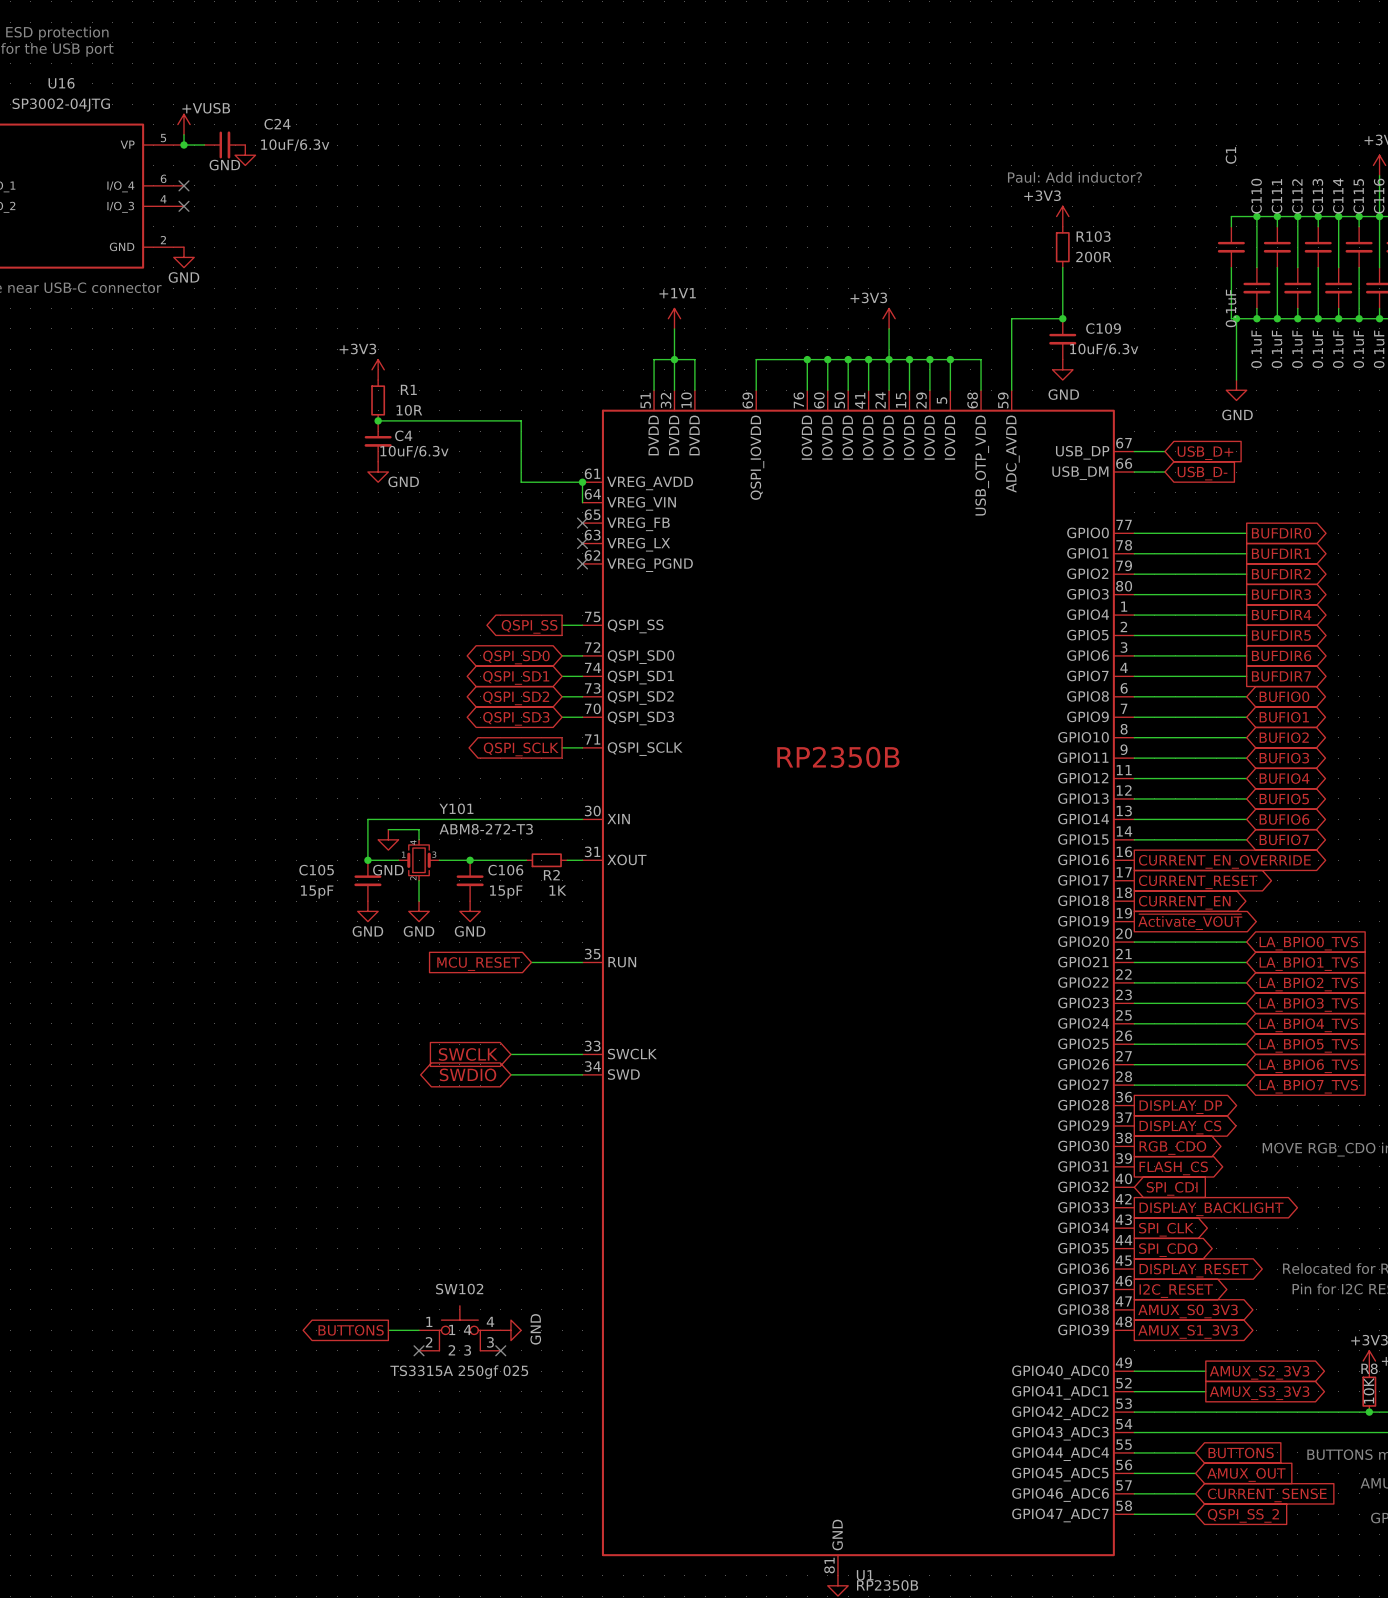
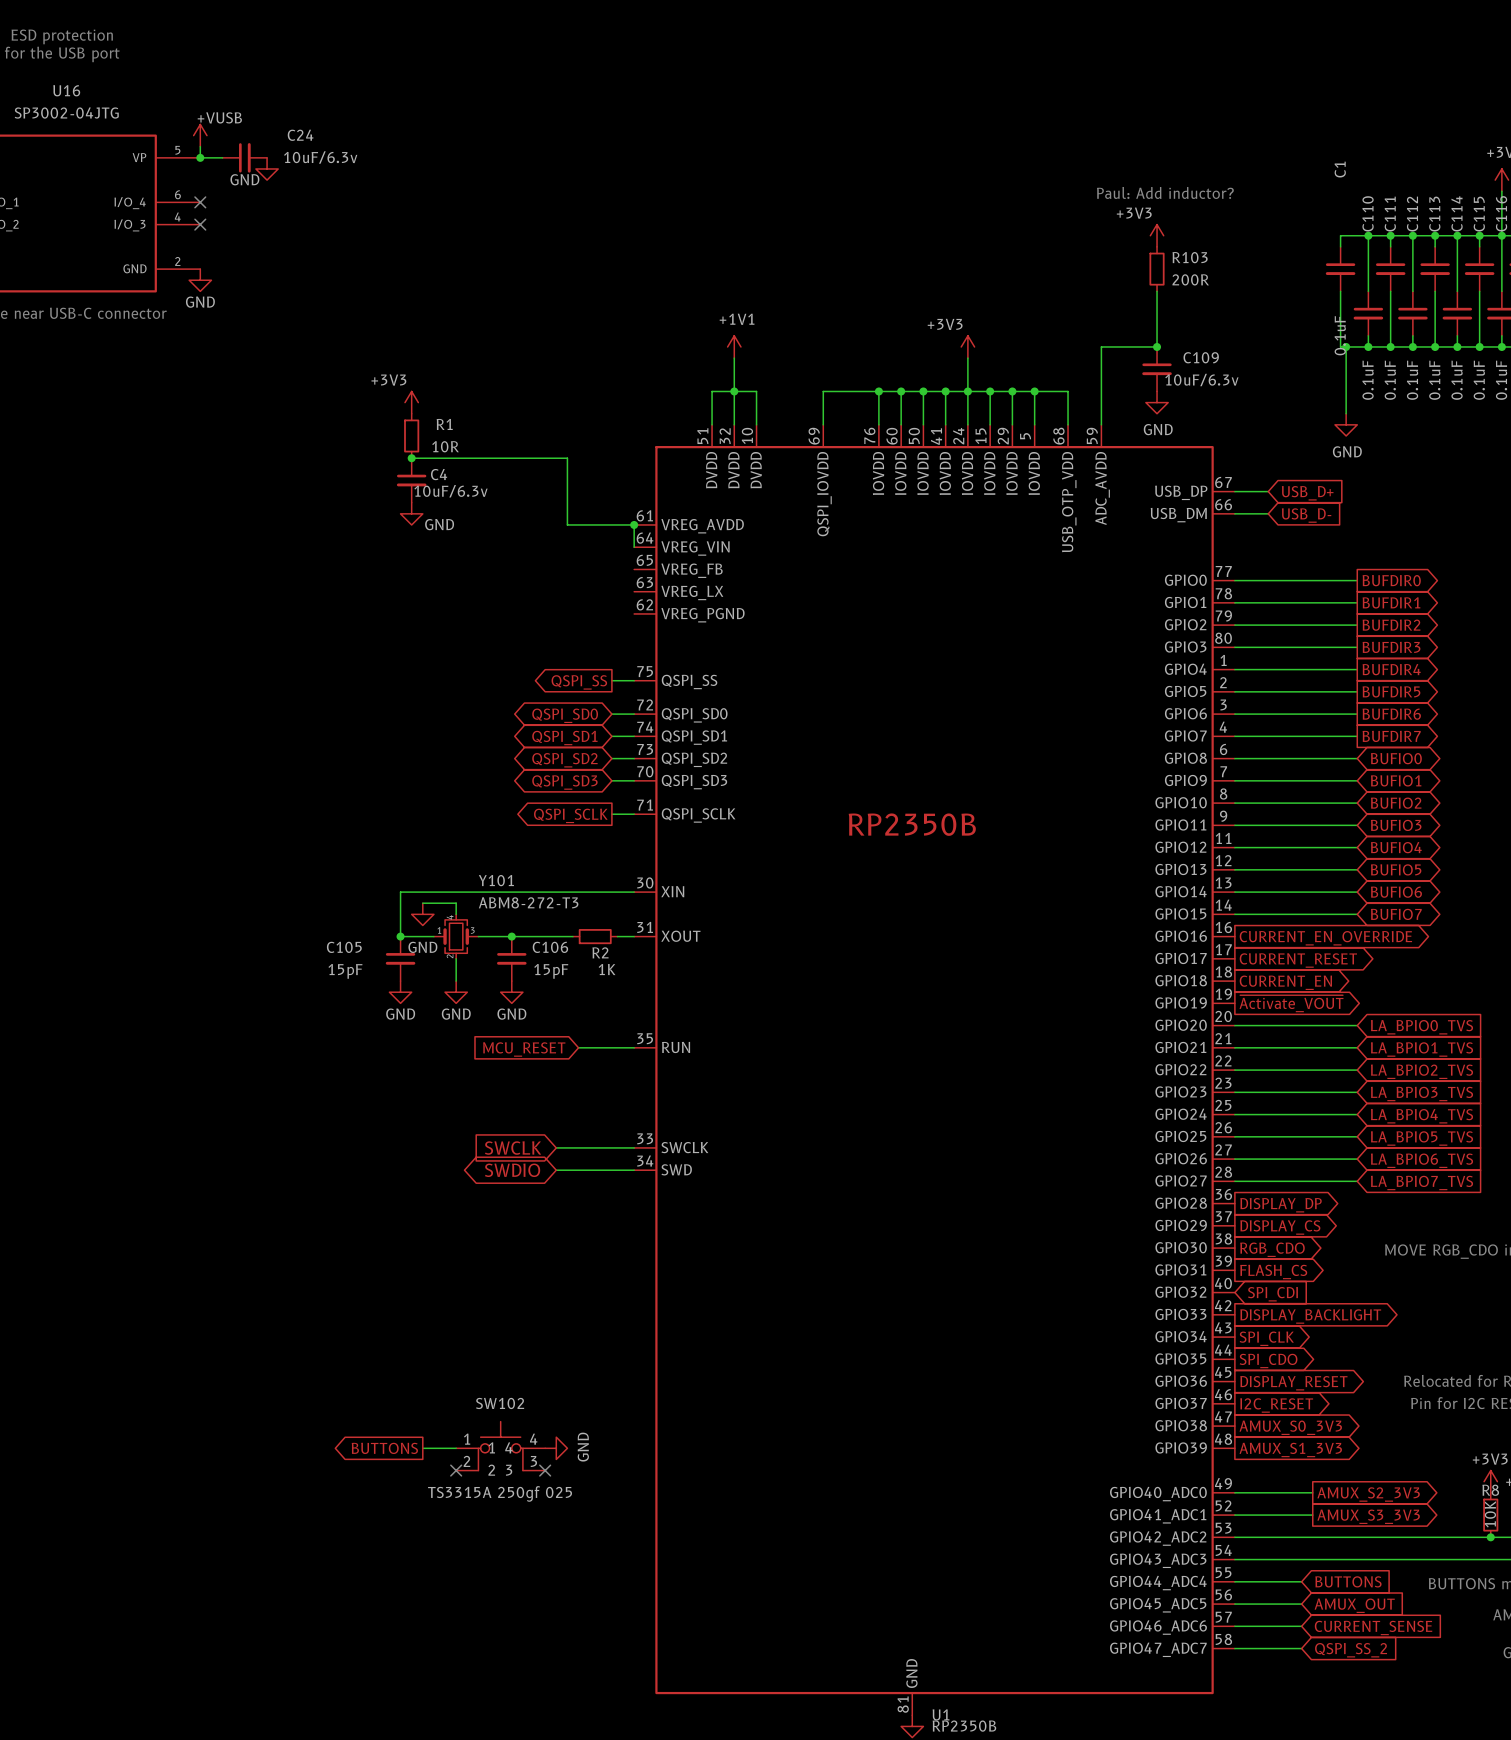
no-connect mark: (582, 523) -> none
no-connect mark: (582, 543) -> none
no-connect mark: (582, 563) -> none

